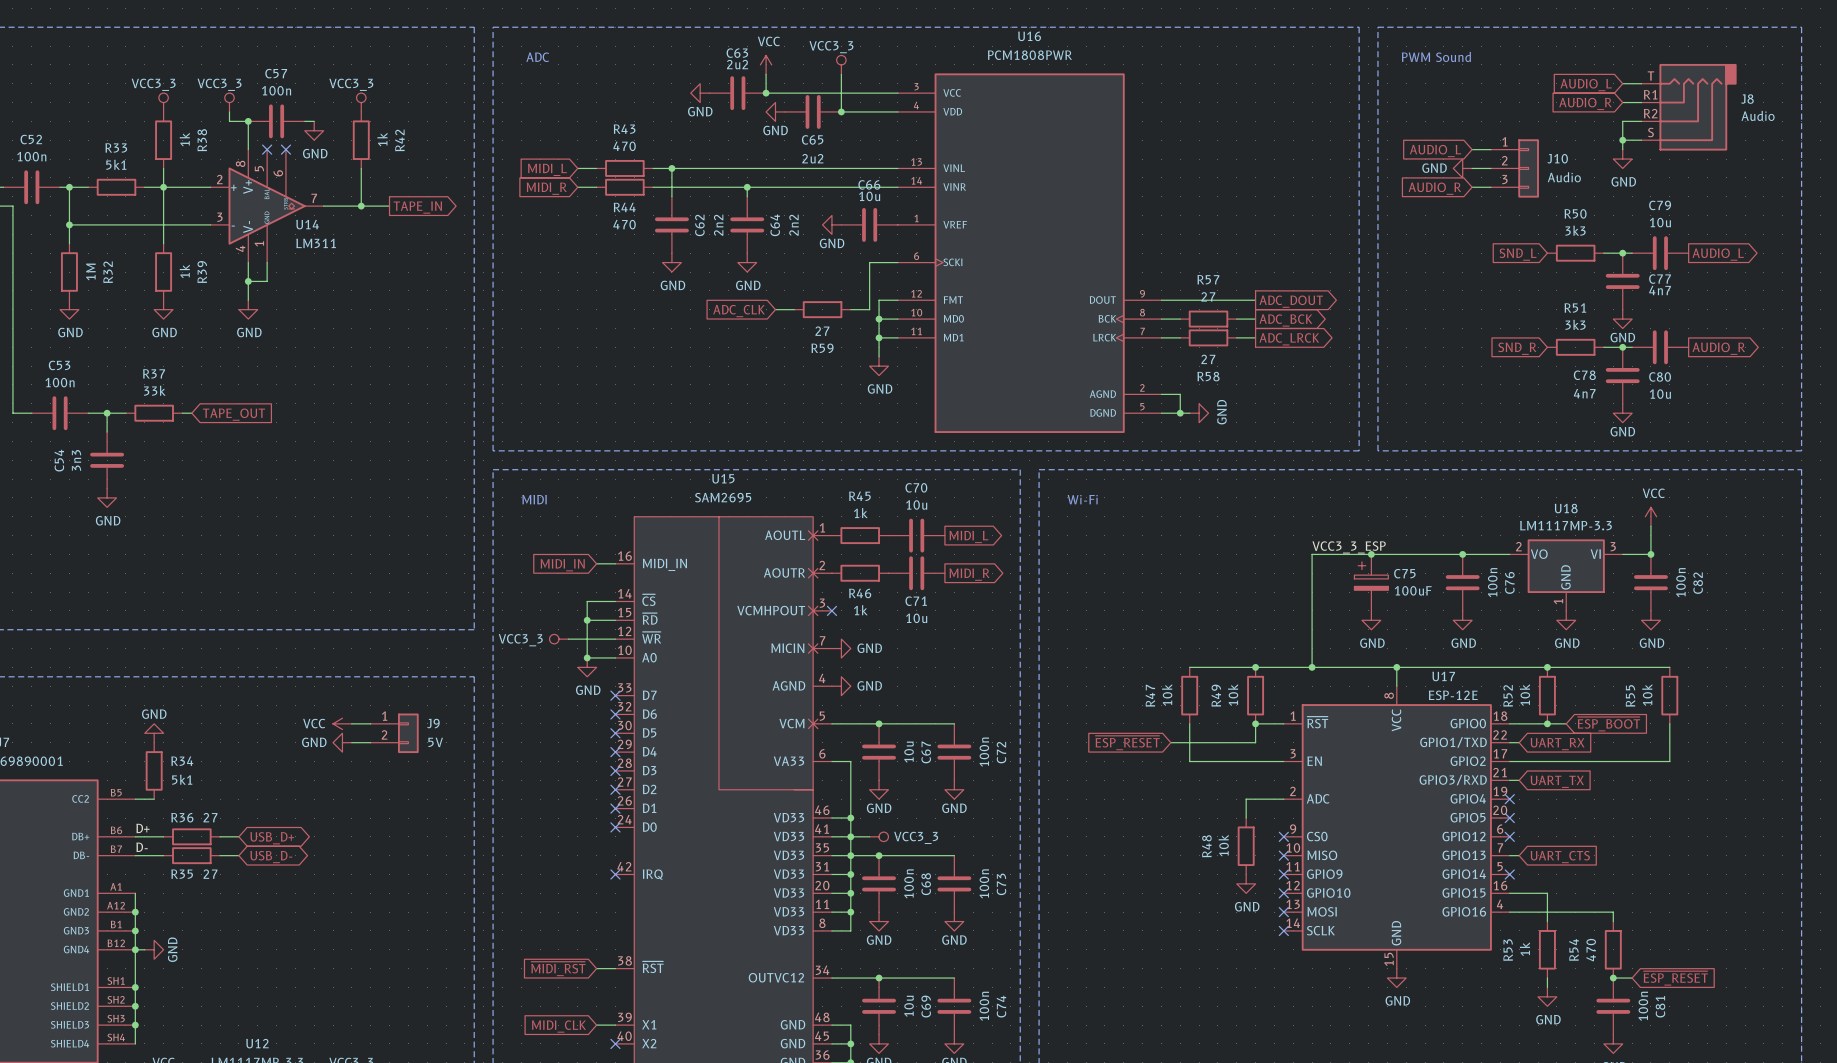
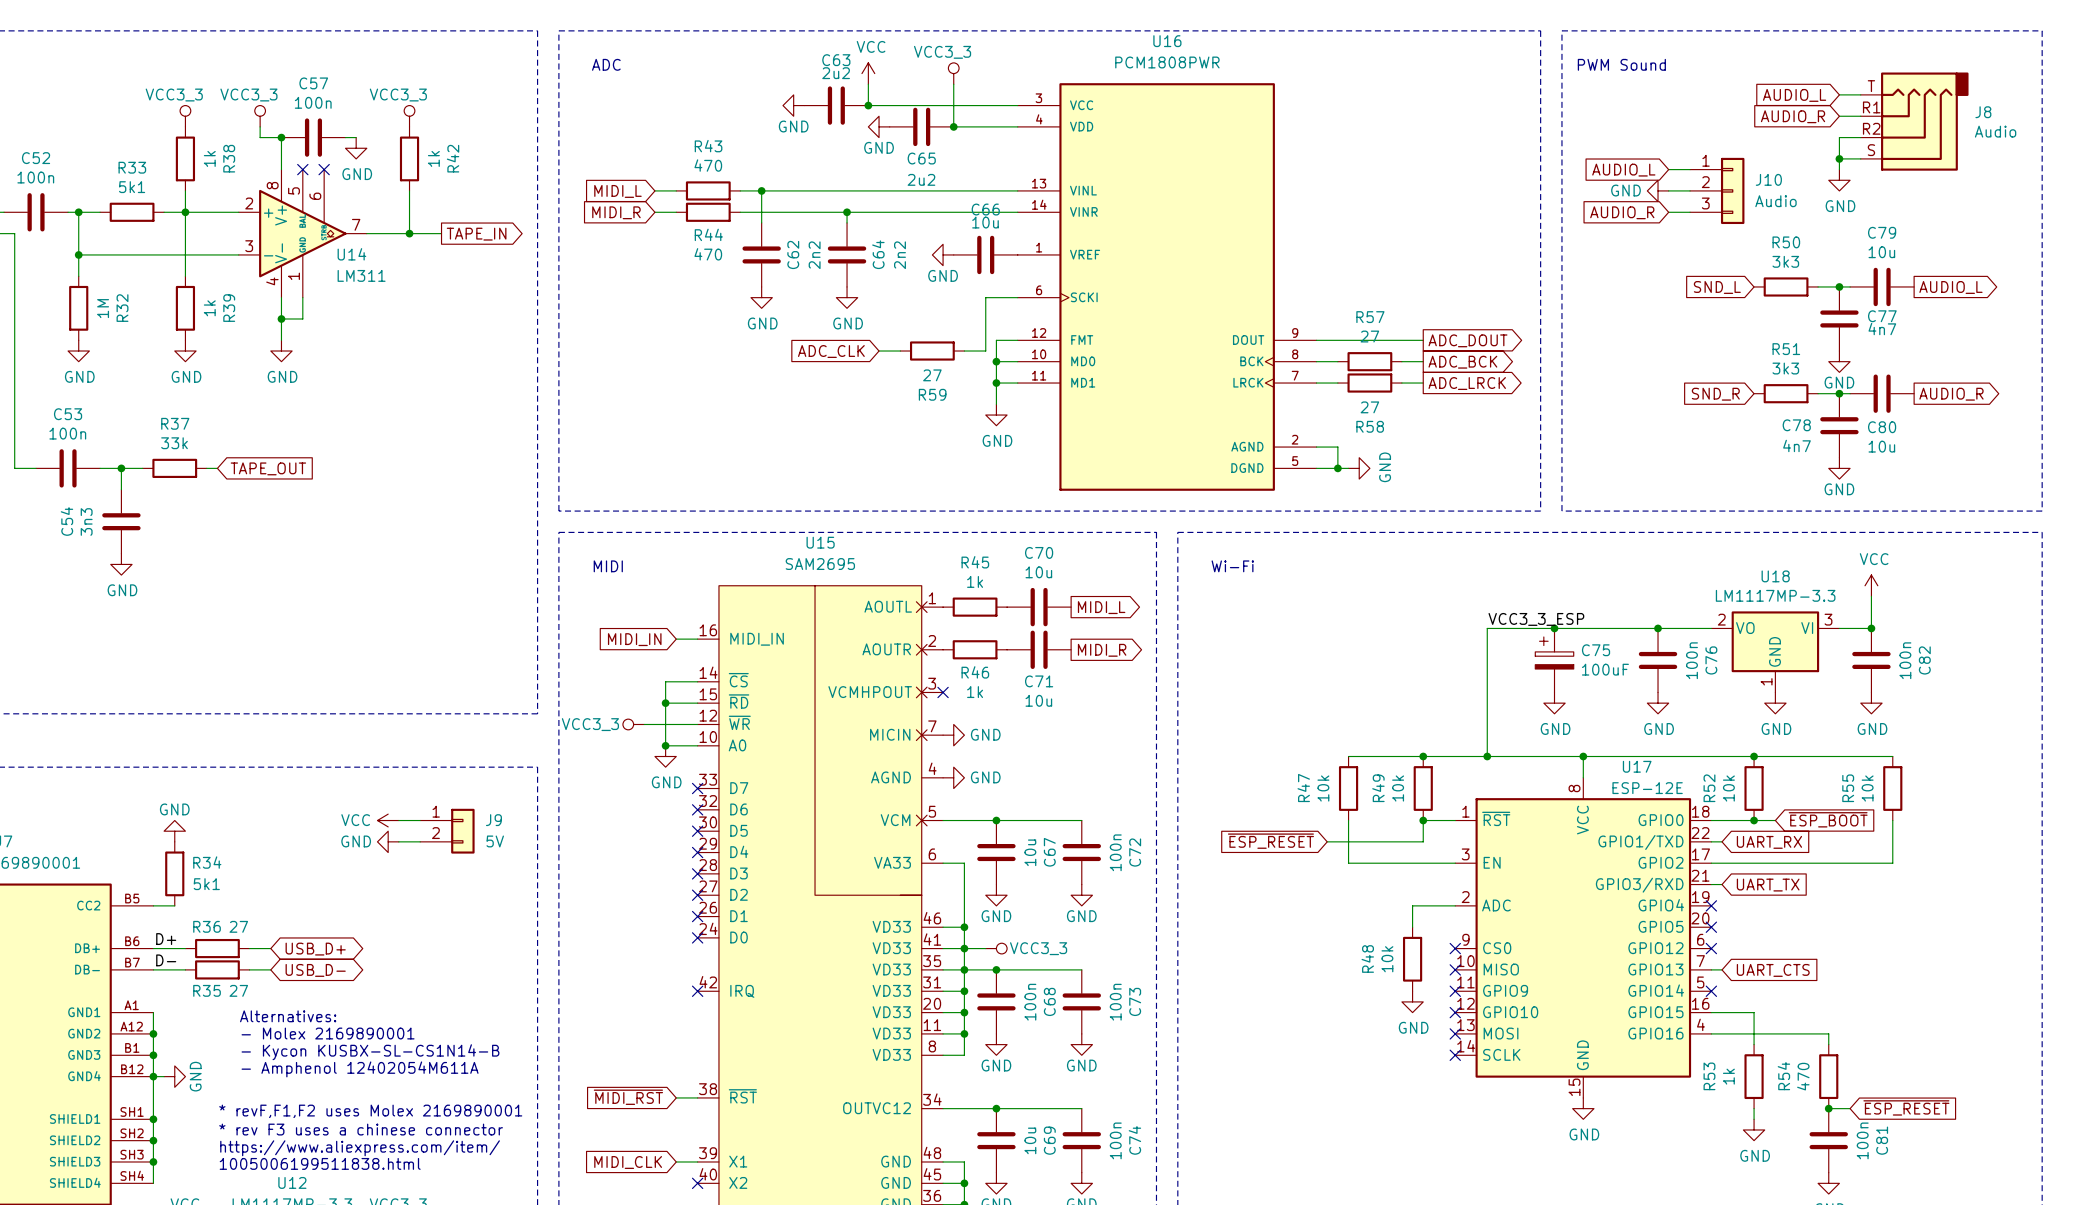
text: none -> Alternatives: (288, 1016)
text: none -> - Molex 2169890001 (328, 1033)
text: none -> - Kycon KUSBX-SL-CS1N14-B (370, 1052)
text: none -> - Amphenol 12402054M611A (360, 1069)
text: none -> * revF,F1,F2 uses Molex 2169890001 (370, 1111)
text: none -> * rev F3 uses a chinese connector (361, 1129)
text: none -> https://www.aliexpress.com/item/ (360, 1148)
text: none -> 1005006199511838.html (320, 1163)

